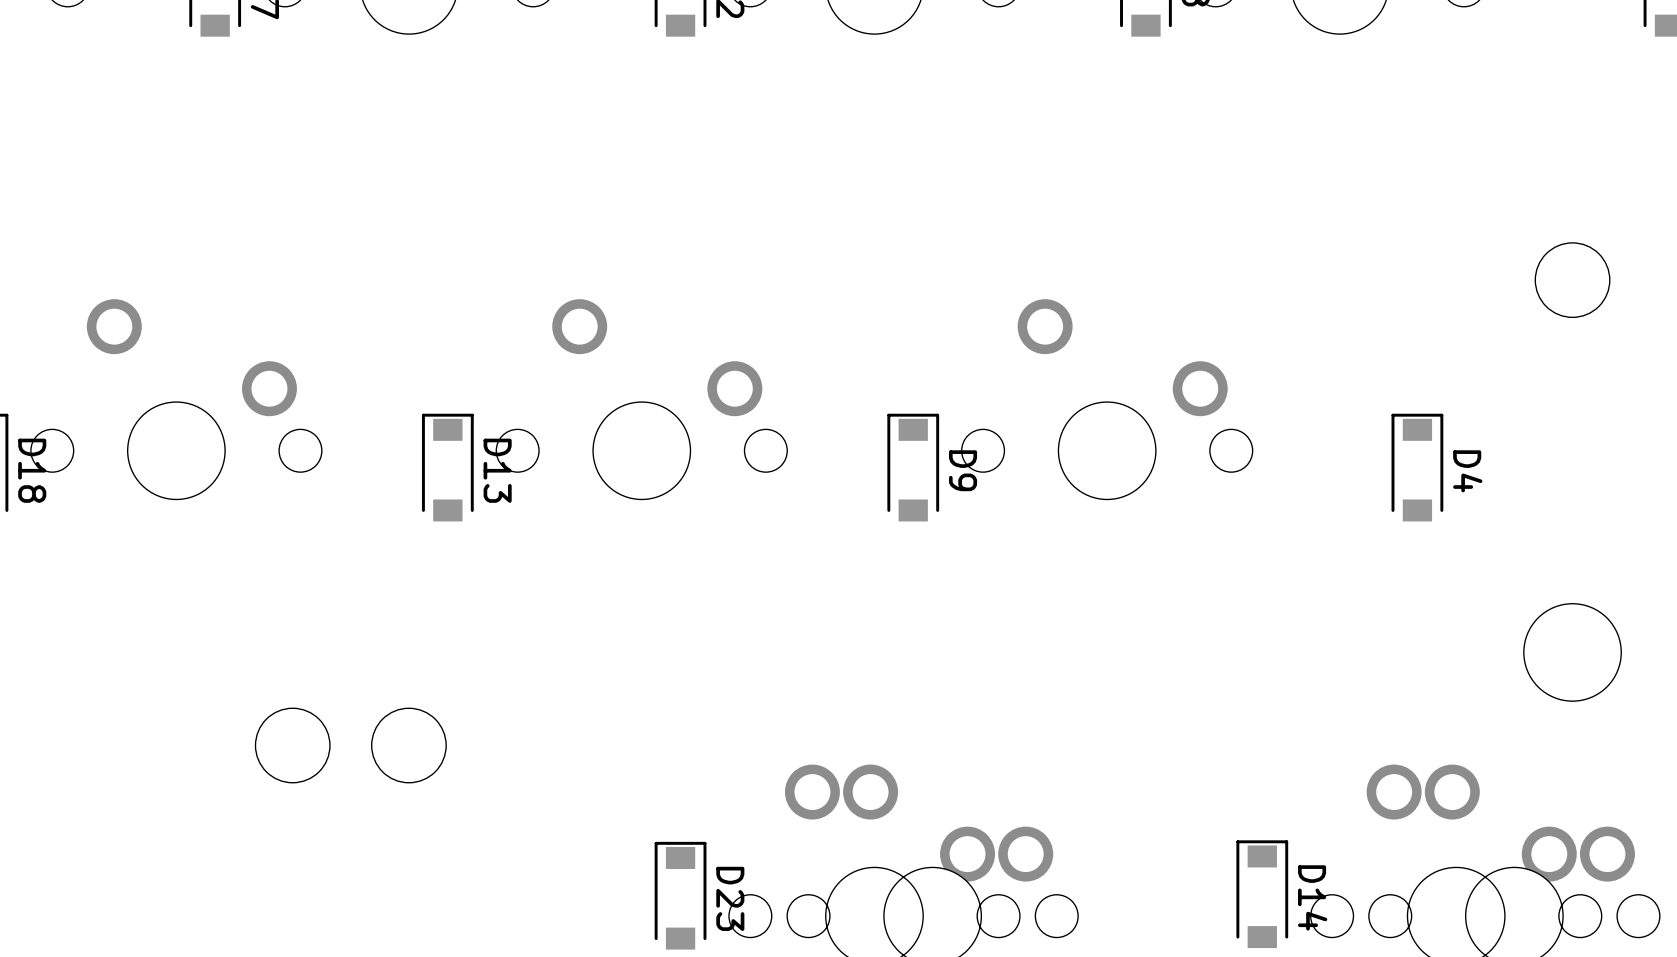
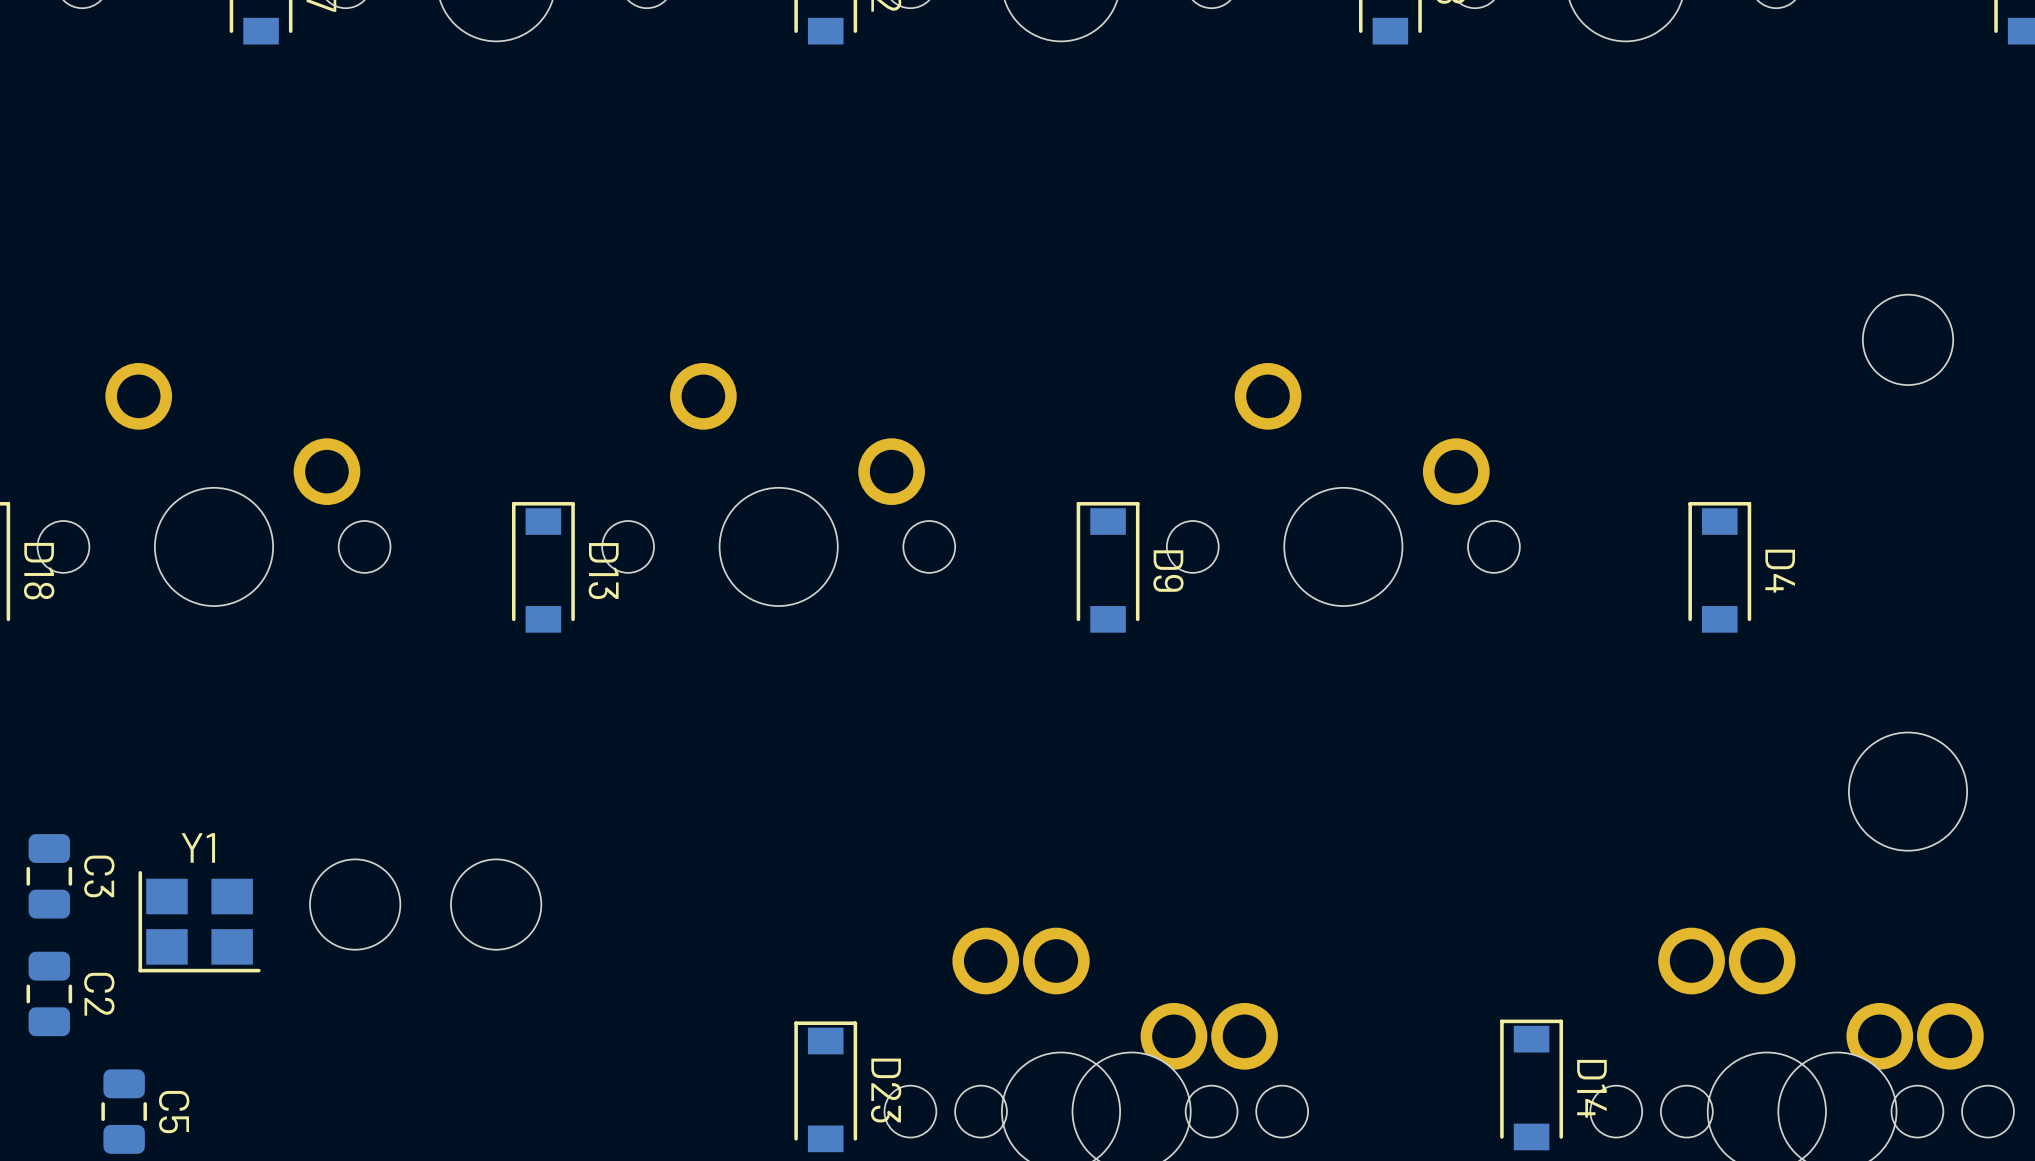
C3: none -> (49, 876)
Y1: none -> (199, 921)
C2: none -> (49, 993)
C5: none -> (124, 1111)

